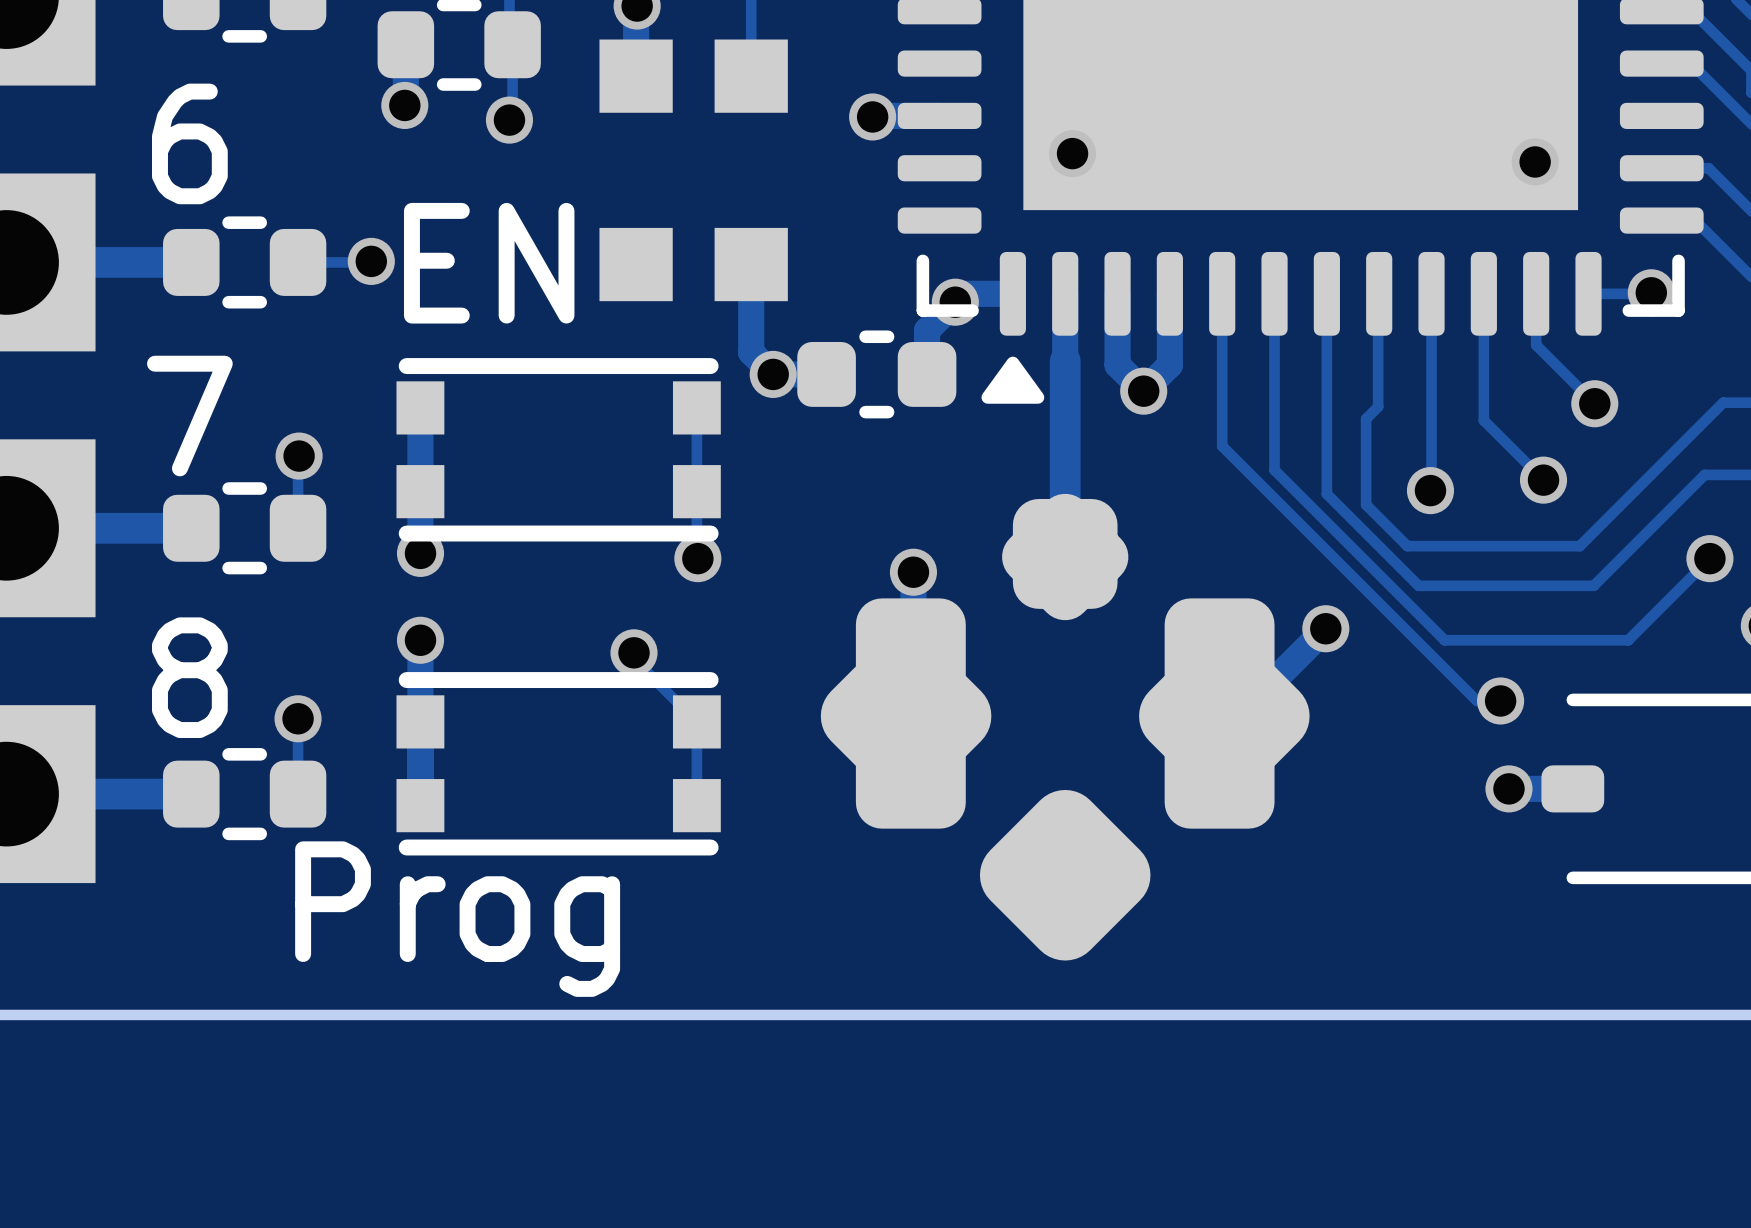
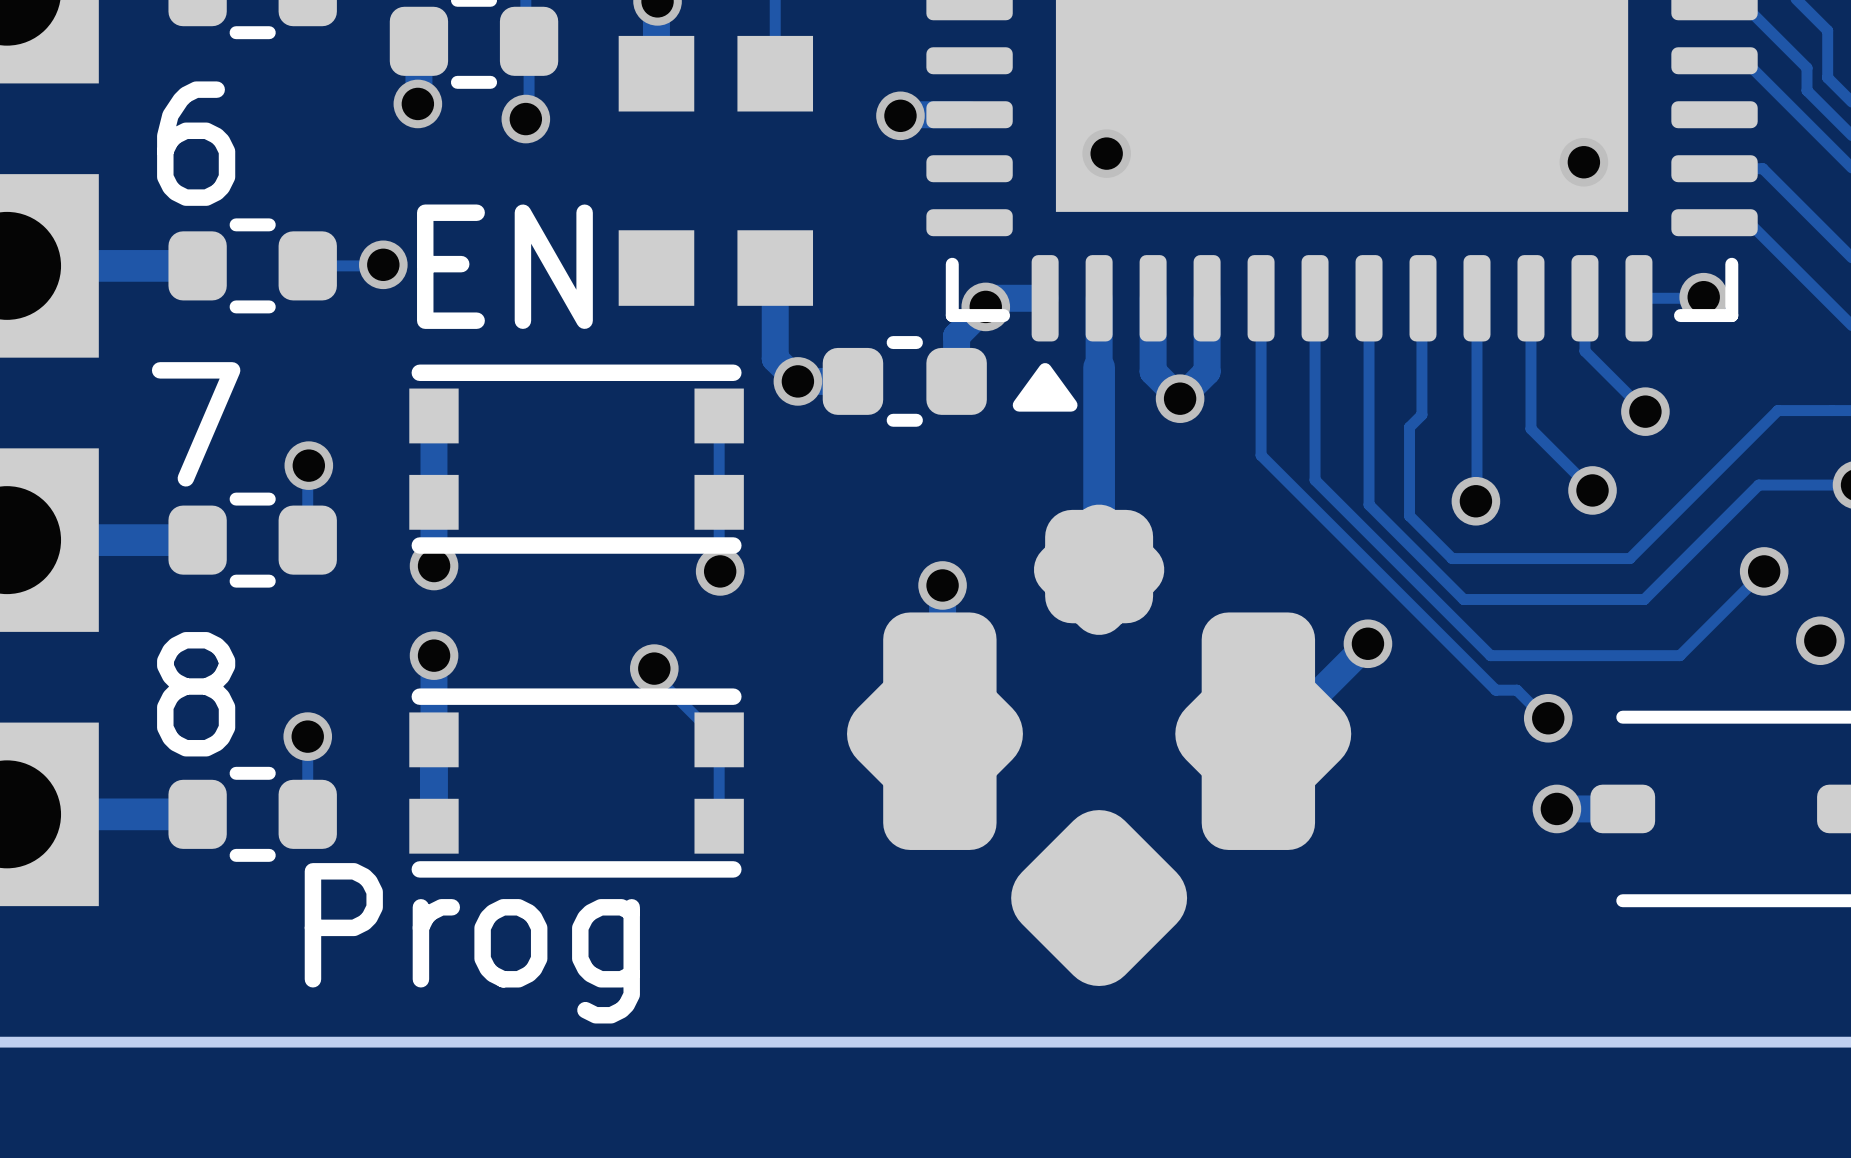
track: (1449, 673) (1477, 700) (1497, 700) -> (1495, 690) (1516, 690) (1545, 718)

